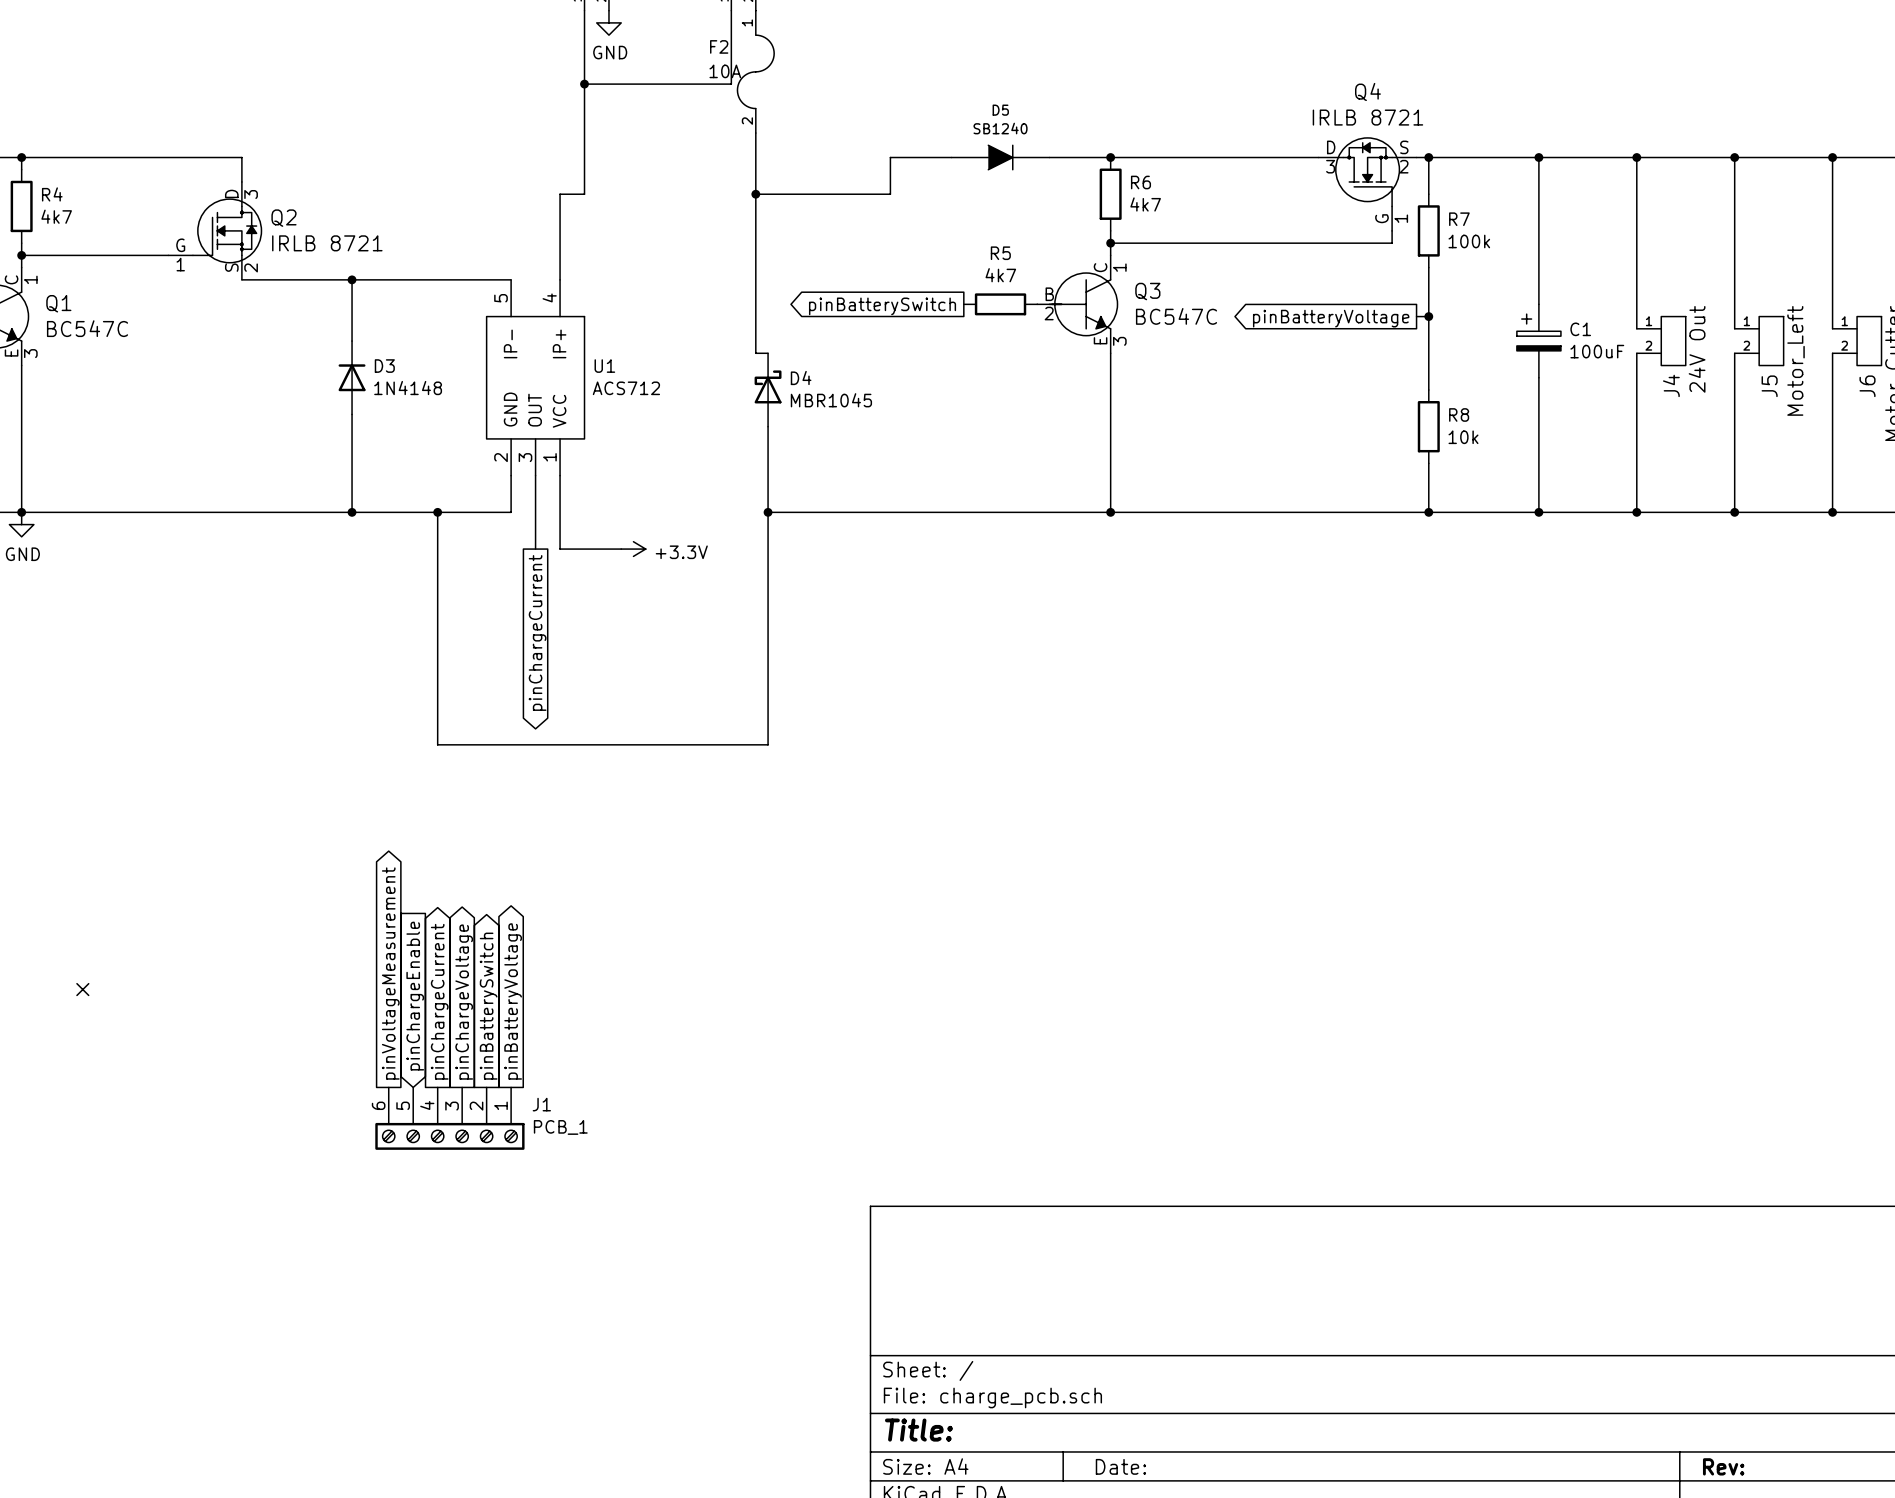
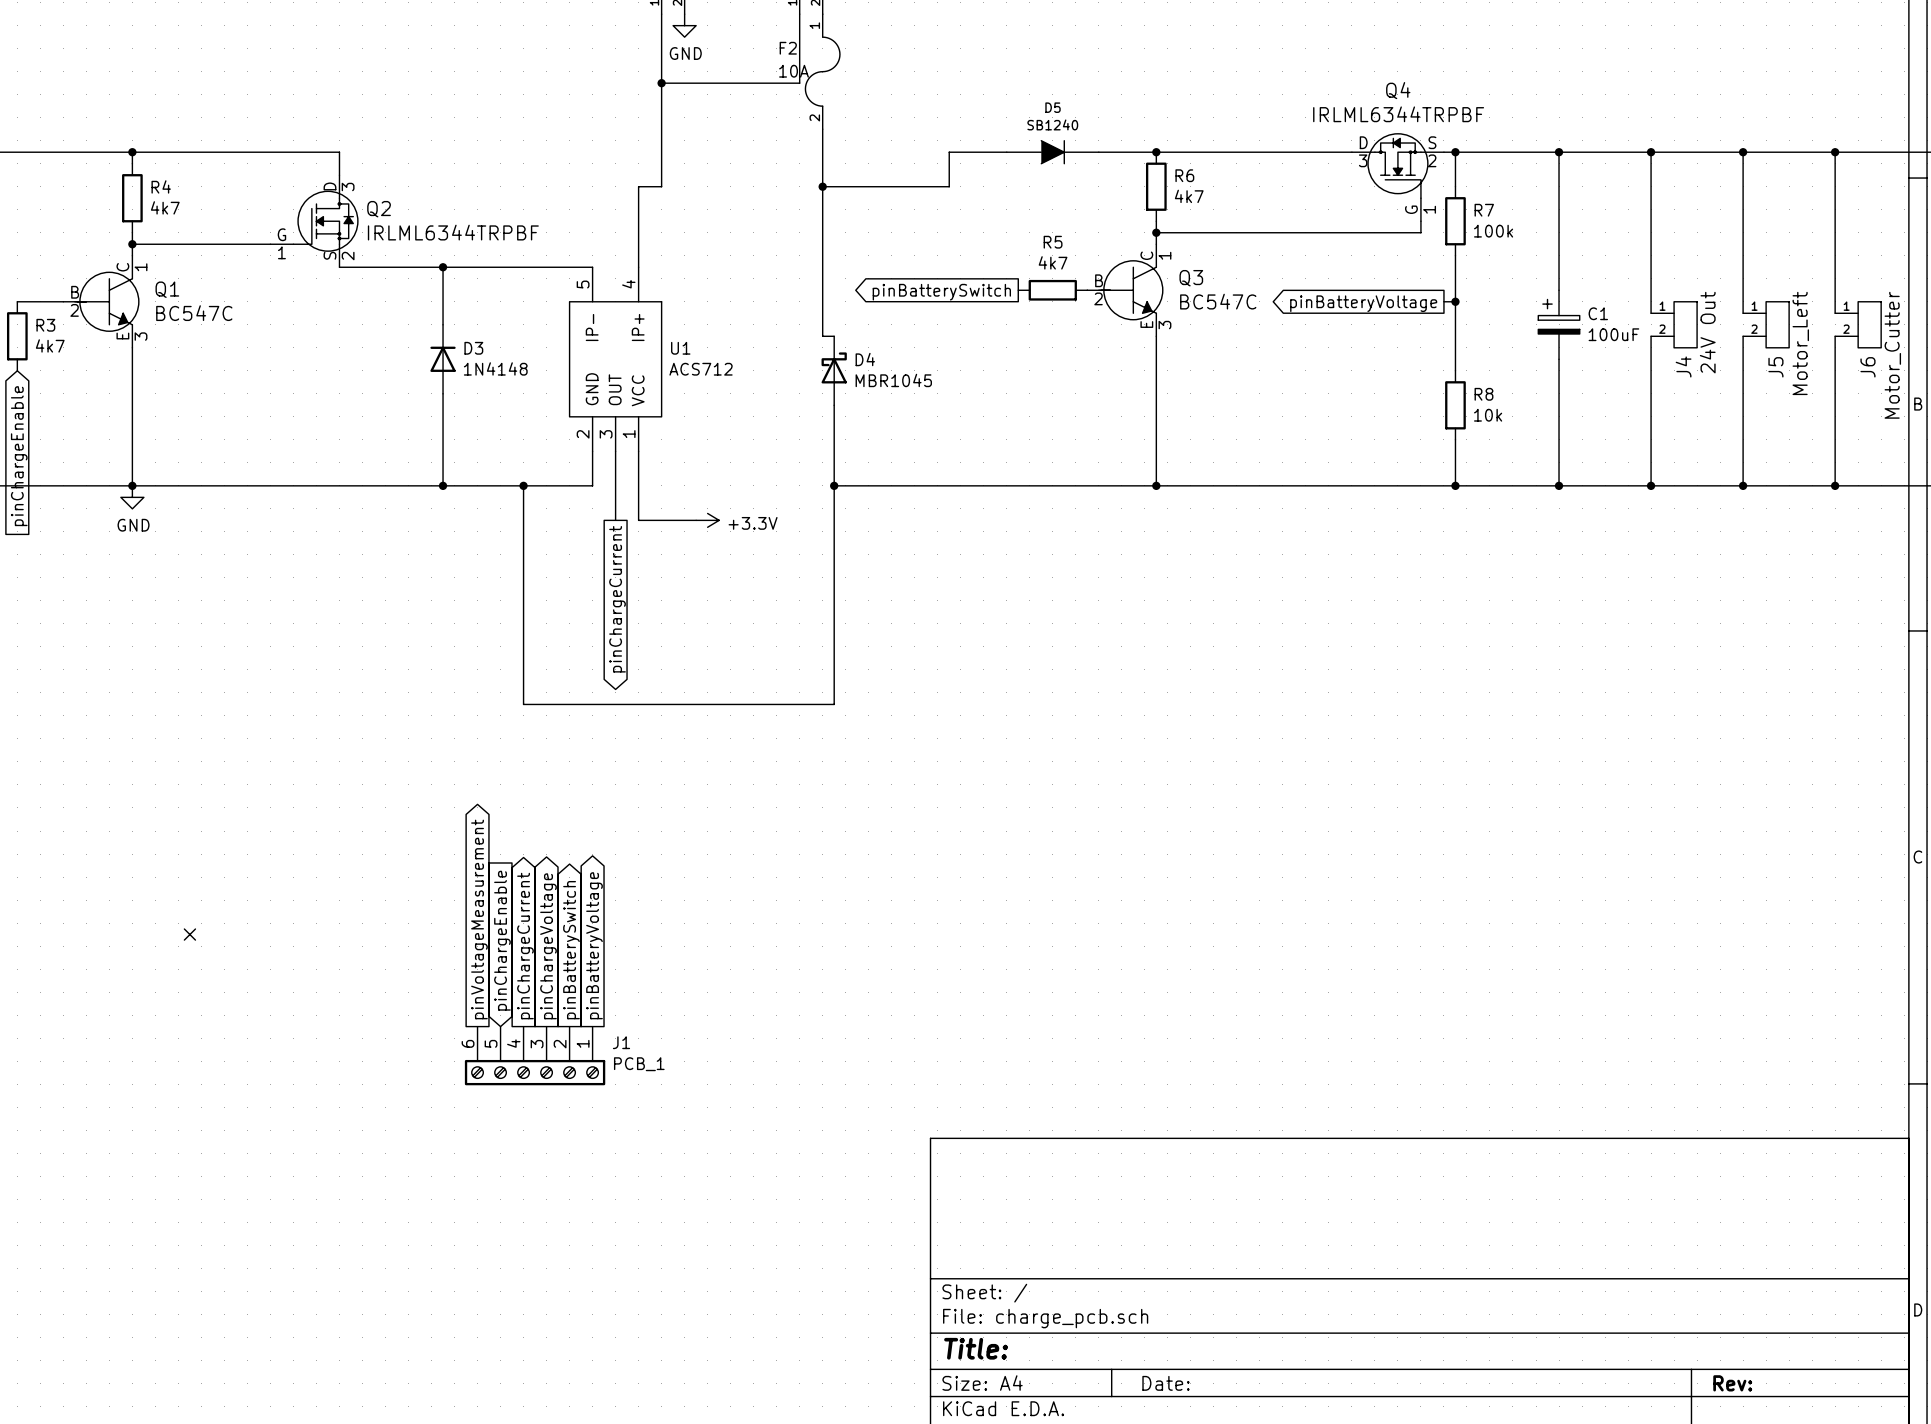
Q4 value: IRLB 8721 (1367, 117) -> IRLML6344TRPBF (1398, 114)
Q2 value: IRLB 8721 (327, 243) -> IRLML6344TRPBF (453, 232)

